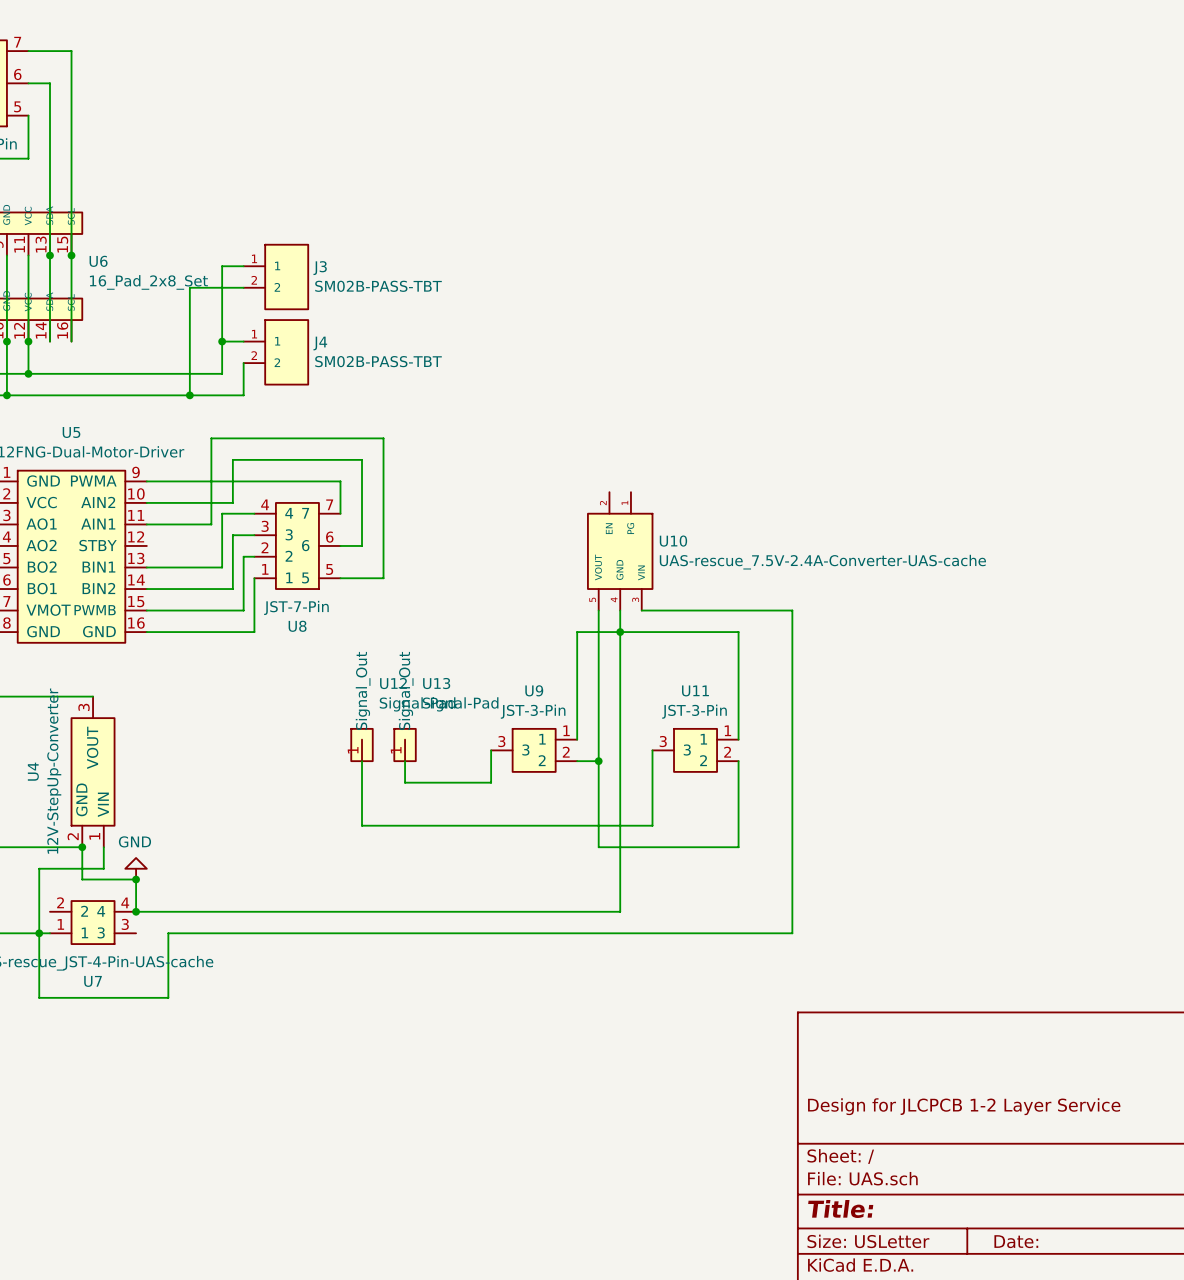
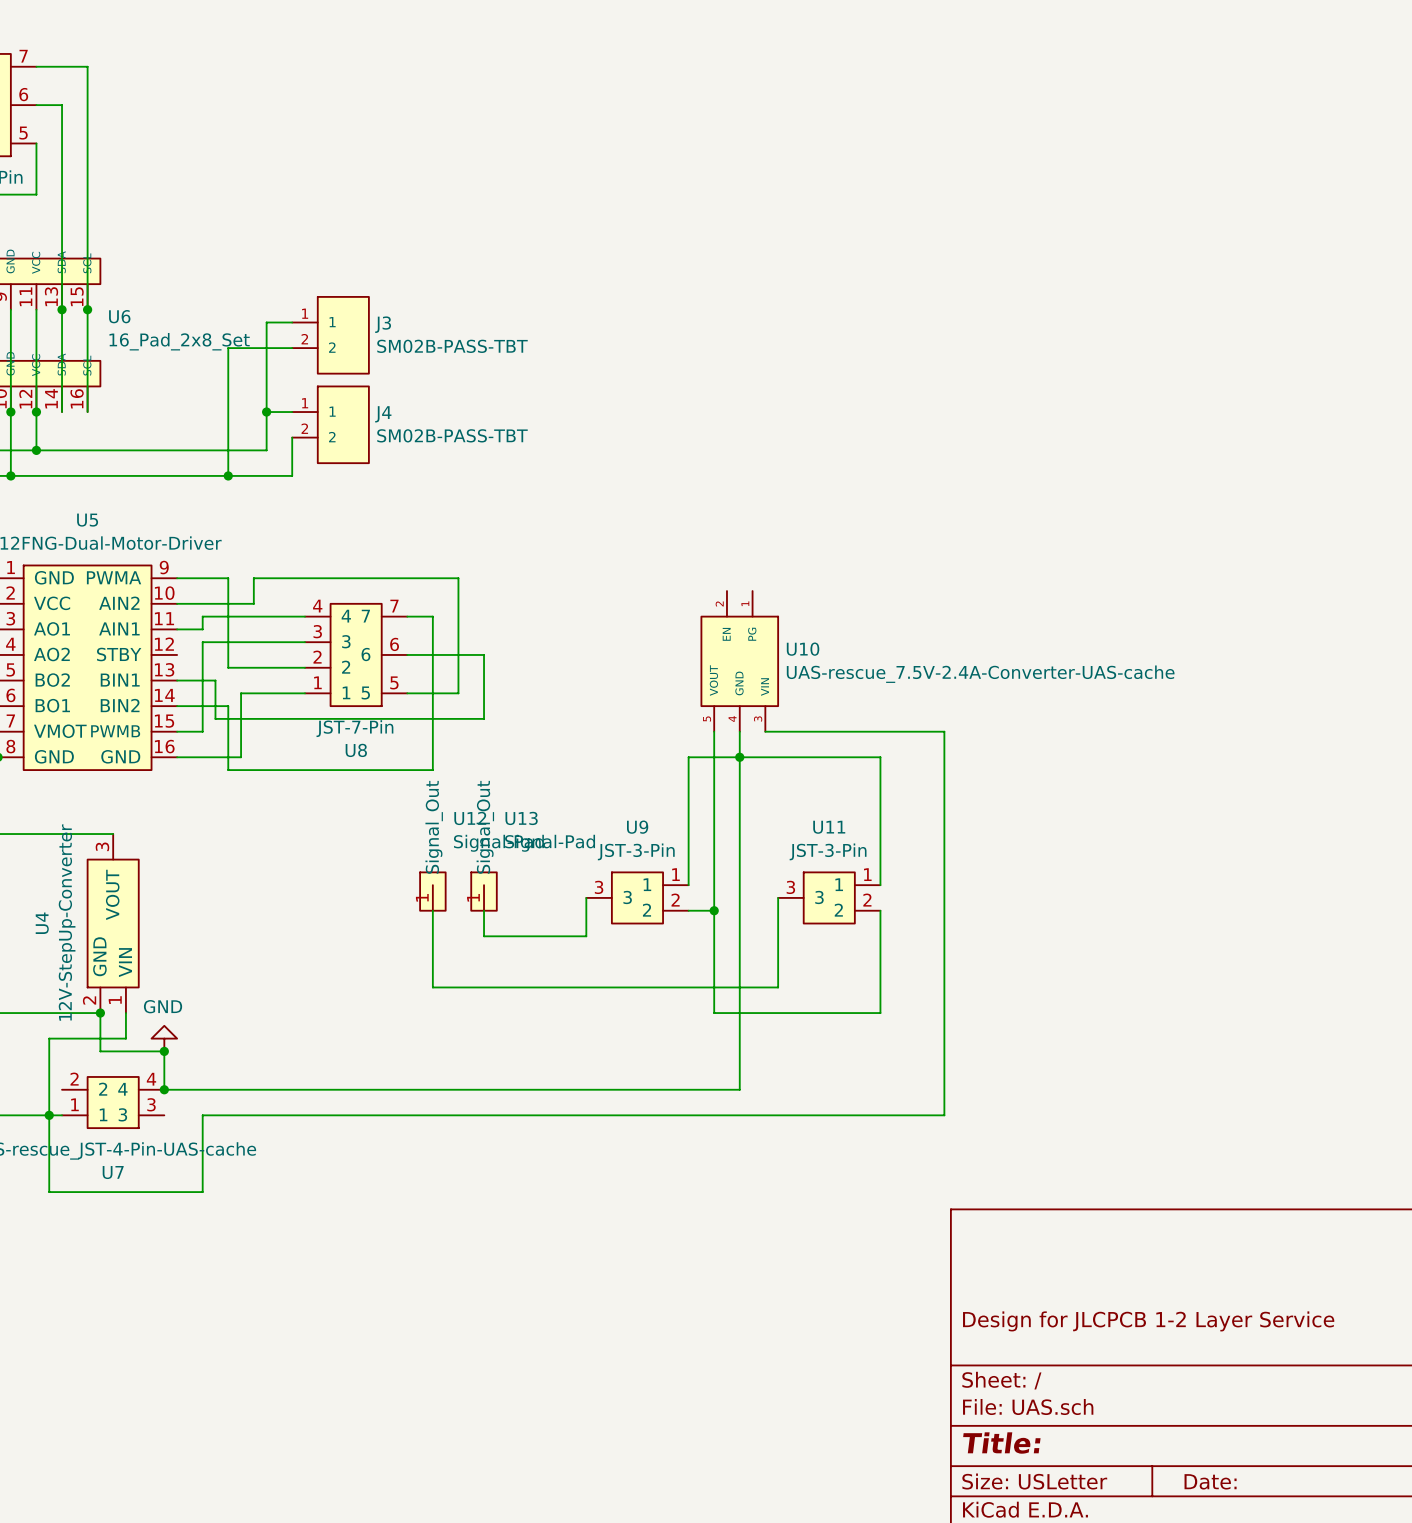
wire: (189, 481) (211, 481) (211, 438) (383, 438) (383, 481) -> (407, 578) (458, 578)
wire: none -> (228, 578) (228, 667) (292, 667)
wire: (340, 481) (340, 513) -> (432, 616) (407, 616)
wire: (222, 513) (222, 567) (179, 567) -> (266, 616) (202, 616) (202, 629)
wire: (362, 513) (362, 459) (232, 459) (232, 502) (211, 502) (211, 524) (168, 524) -> none
wire: (232, 535) (232, 589) (189, 589) -> (215, 680) (215, 718) (484, 718) (484, 654) (432, 654) (432, 770) (228, 770) (228, 706)
wire: (243, 556) (243, 610) (168, 610) -> (279, 642) (202, 642) (202, 731)
wire: (254, 578) (254, 632) (200, 632) -> (304, 693) (241, 693) (241, 757)

